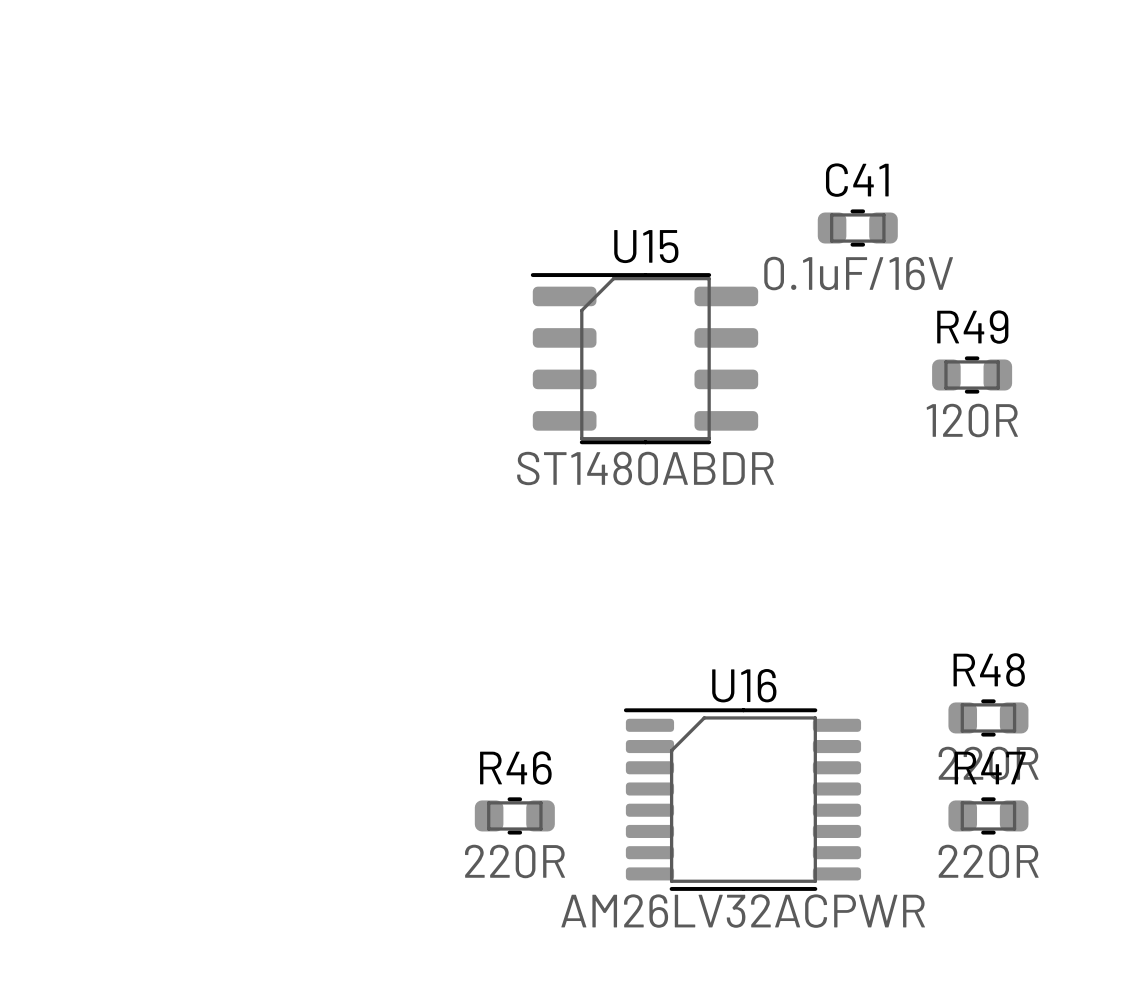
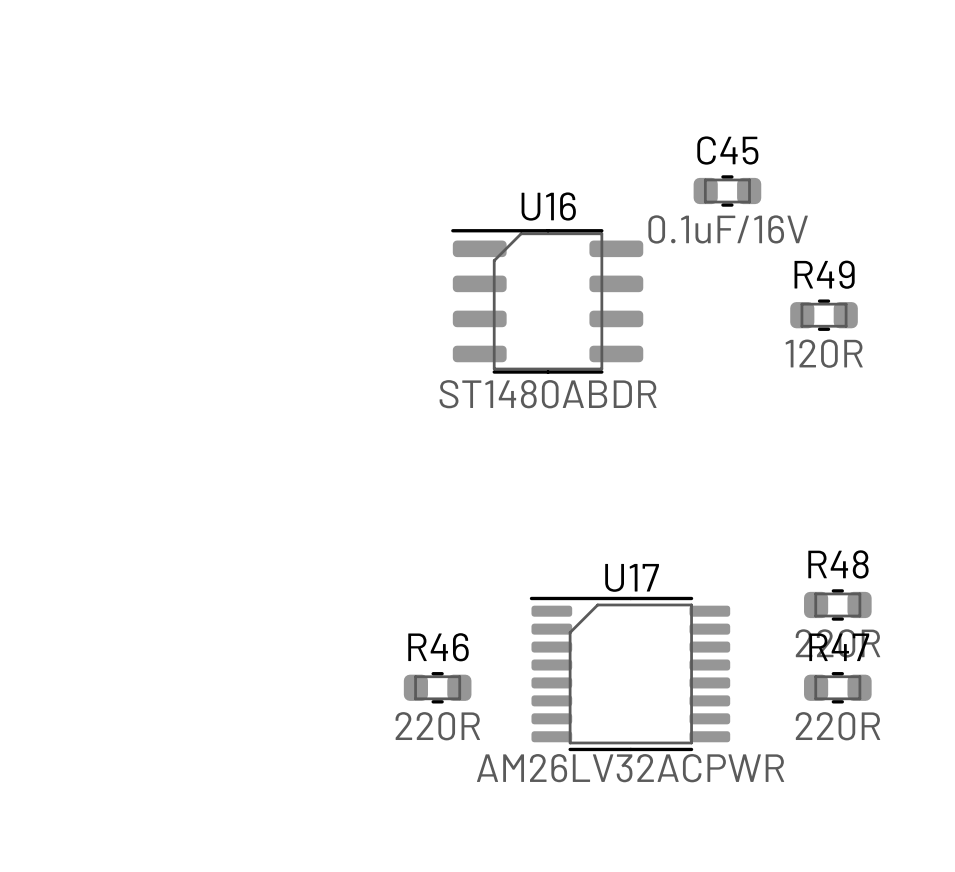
C41 name: C41 (857, 180) -> C45 (727, 150)
U15 name: U15 (646, 246) -> U16 (548, 206)
U16 name: U16 (744, 685) -> U17 (632, 577)

